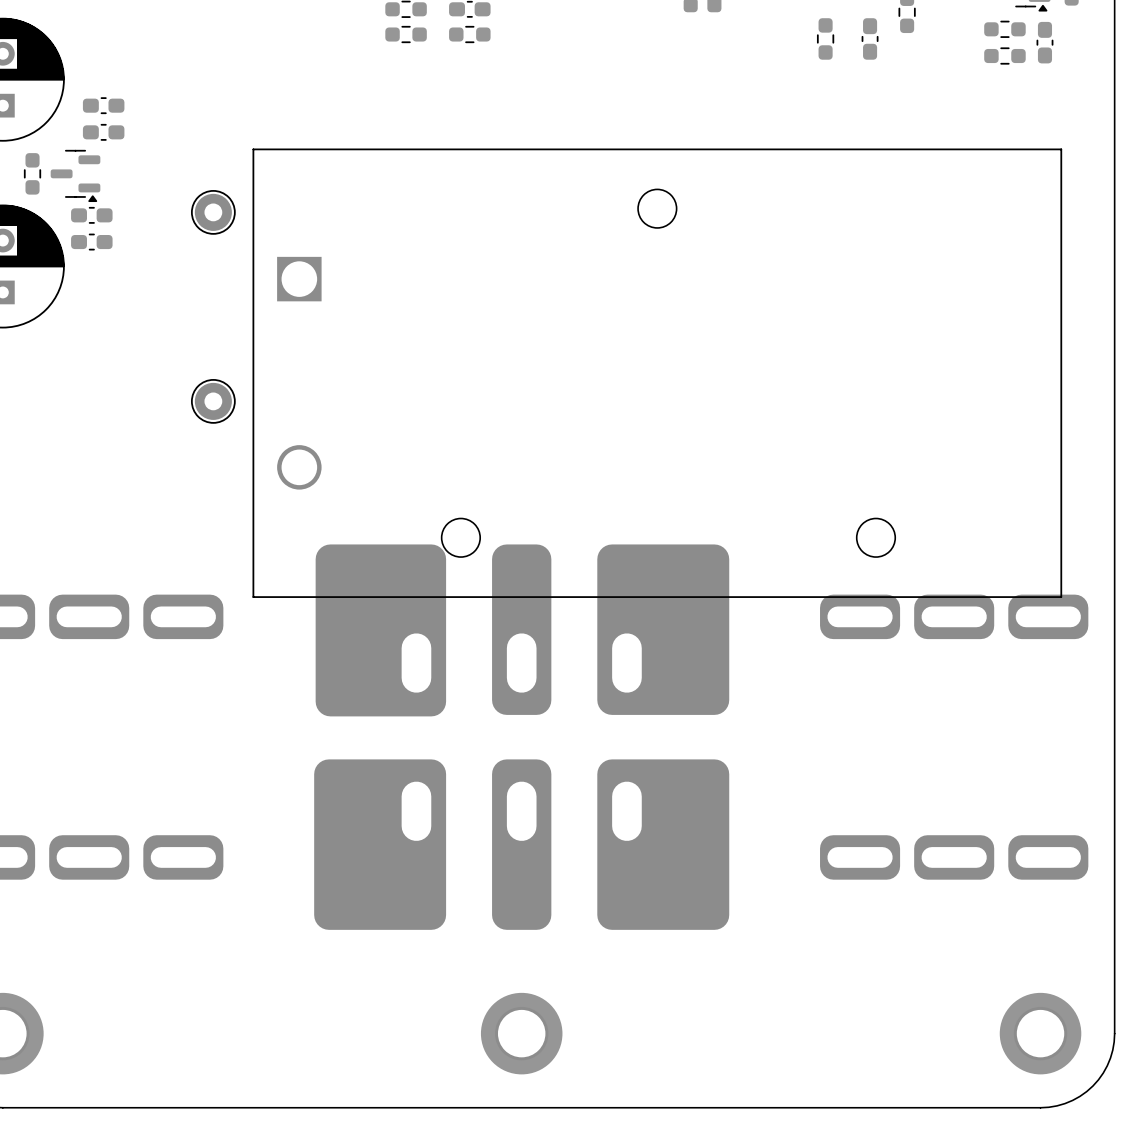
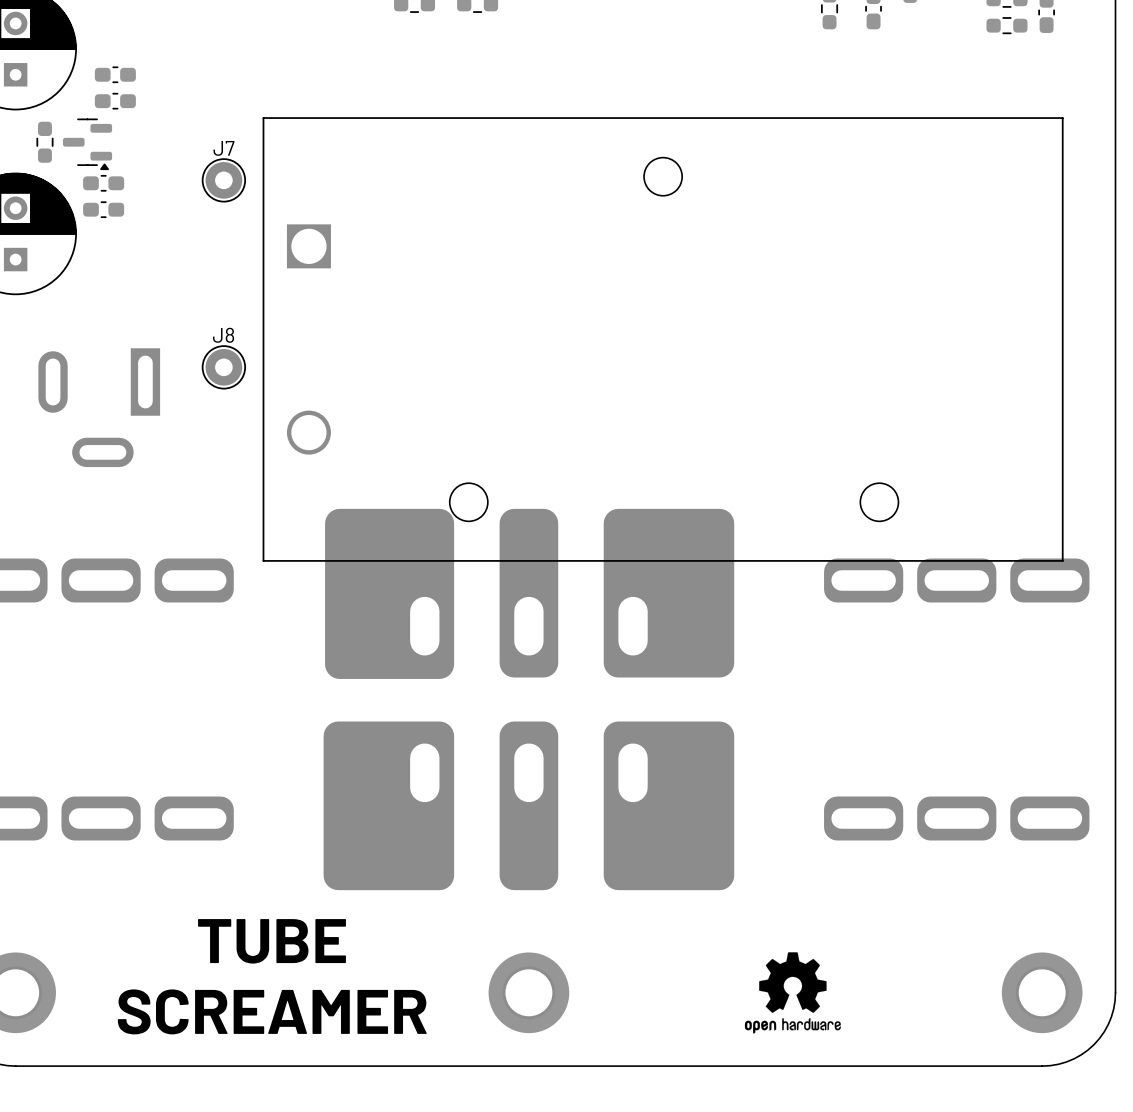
J7 name: none -> J7 (223, 148)
J8 name: none -> J8 (223, 335)
part: none -> (99, 407)
text: none -> TUBE (272, 941)
drawing: none -> [744, 952, 841, 1034]
text: none -> SCREAMER (272, 1011)

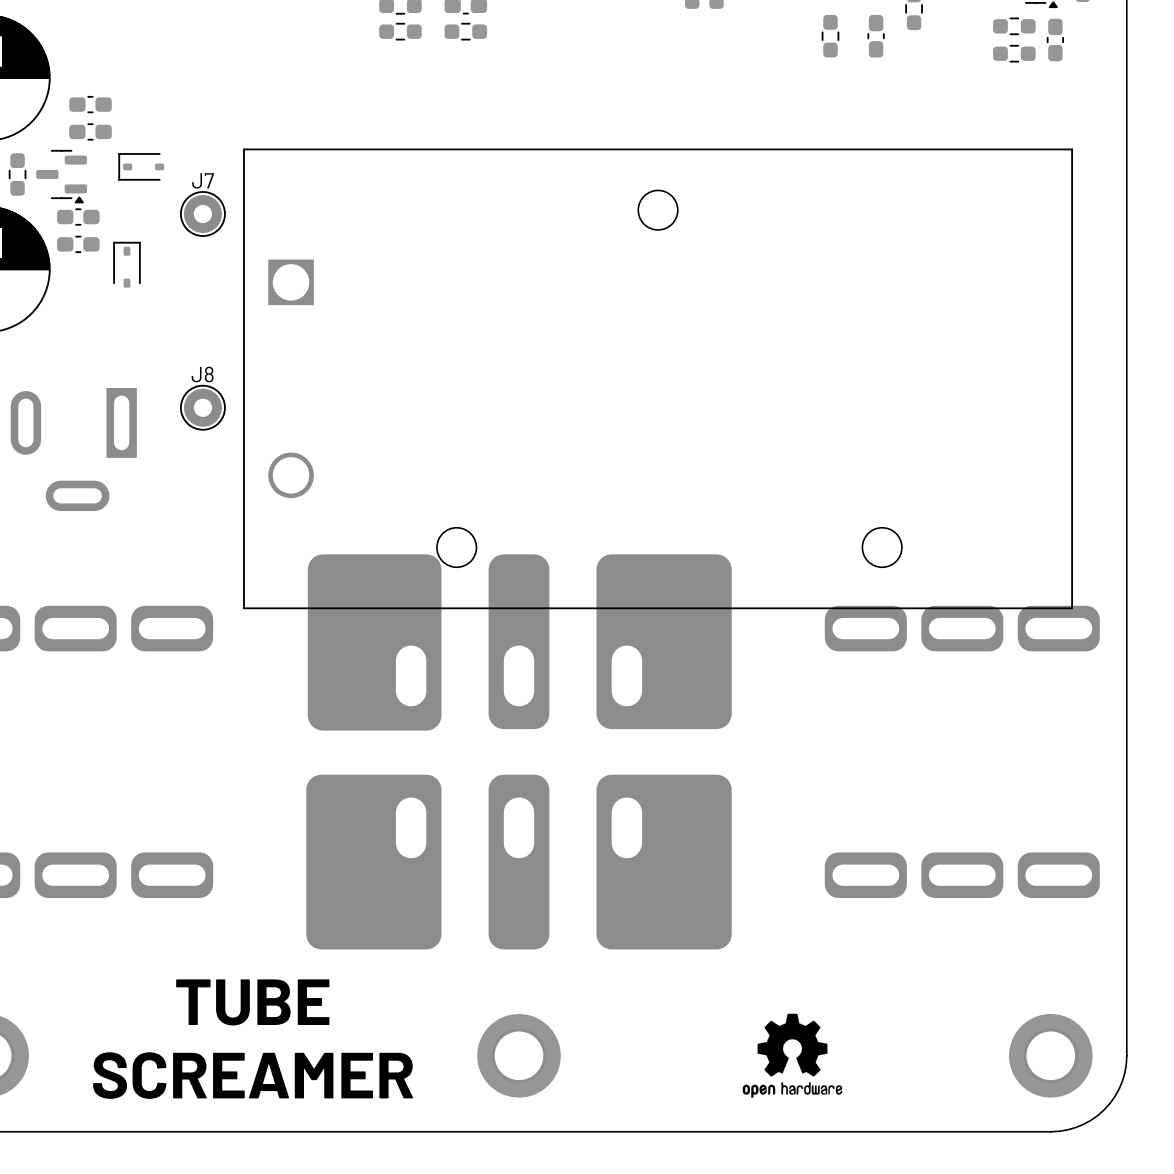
part: none -> (141, 166)
part: none -> (126, 264)

